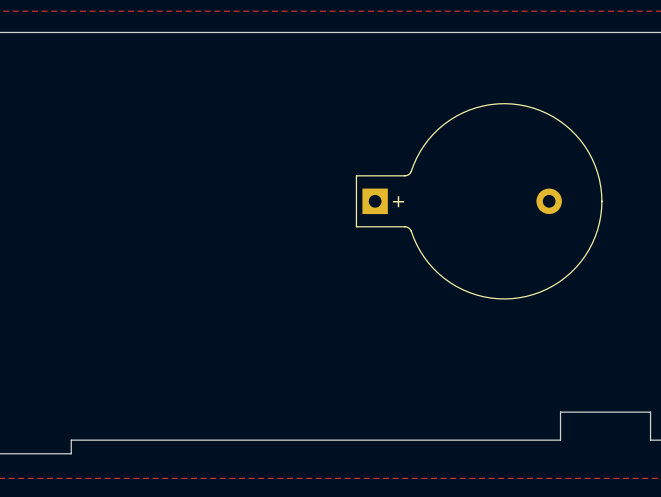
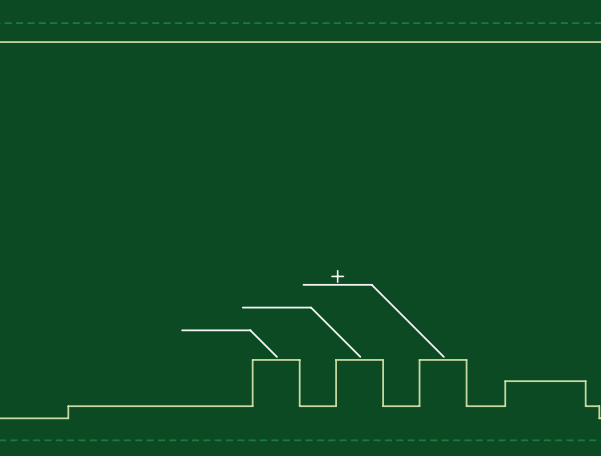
part: (479, 201) -> none
text: none -> + (337, 276)
line: none -> (303, 284) (371, 284) (443, 356)
line: none -> (242, 307) (311, 307) (360, 356)
line: none -> (182, 330) (250, 330) (276, 356)
board edge: (277, 440) (330, 440) -> (252, 406) (252, 359) (299, 359) (299, 406)
board edge: (371, 440) (423, 440) -> (336, 406) (336, 359) (383, 359) (383, 406)
board edge: (464, 440) (517, 440) -> (419, 406) (419, 359) (466, 359) (466, 406)

